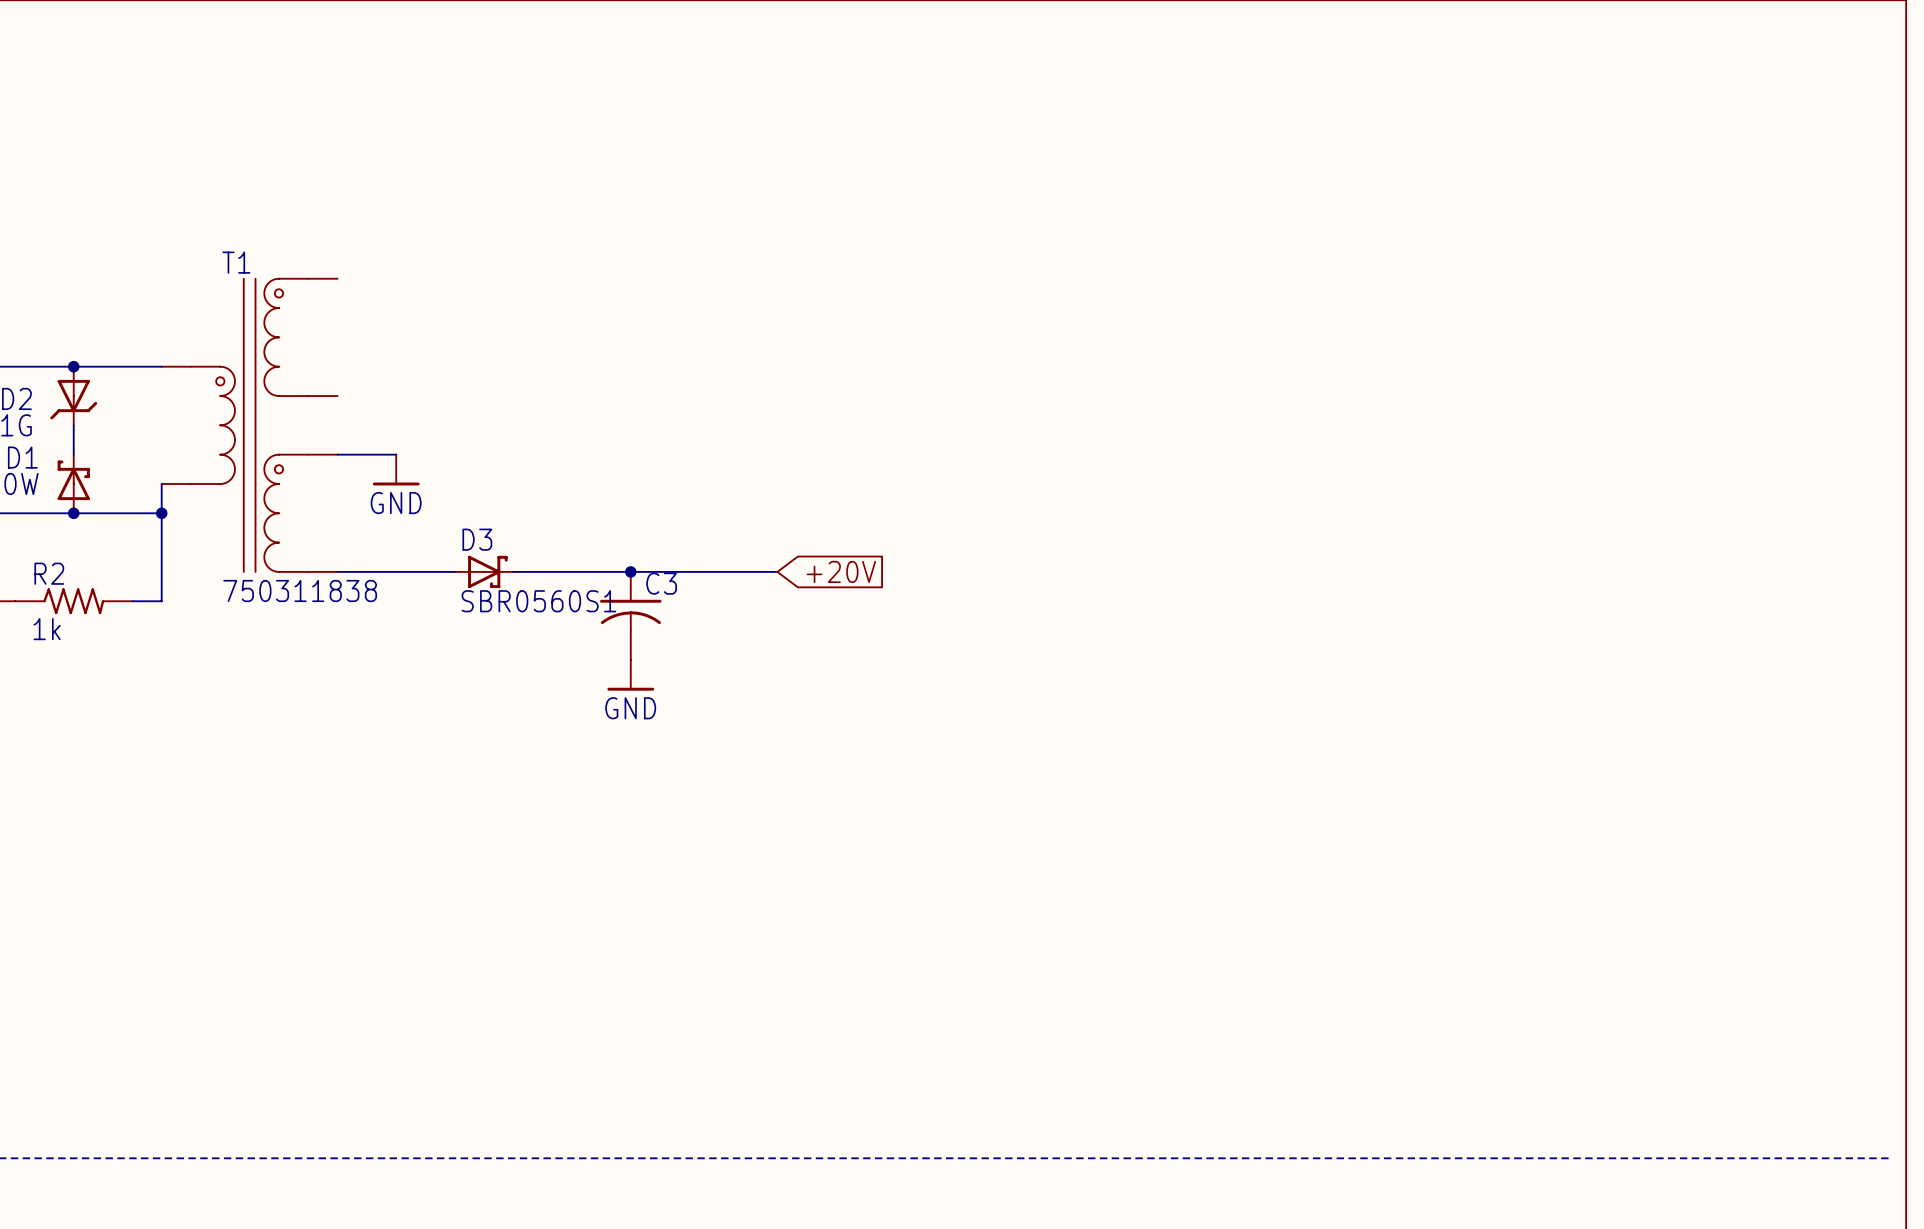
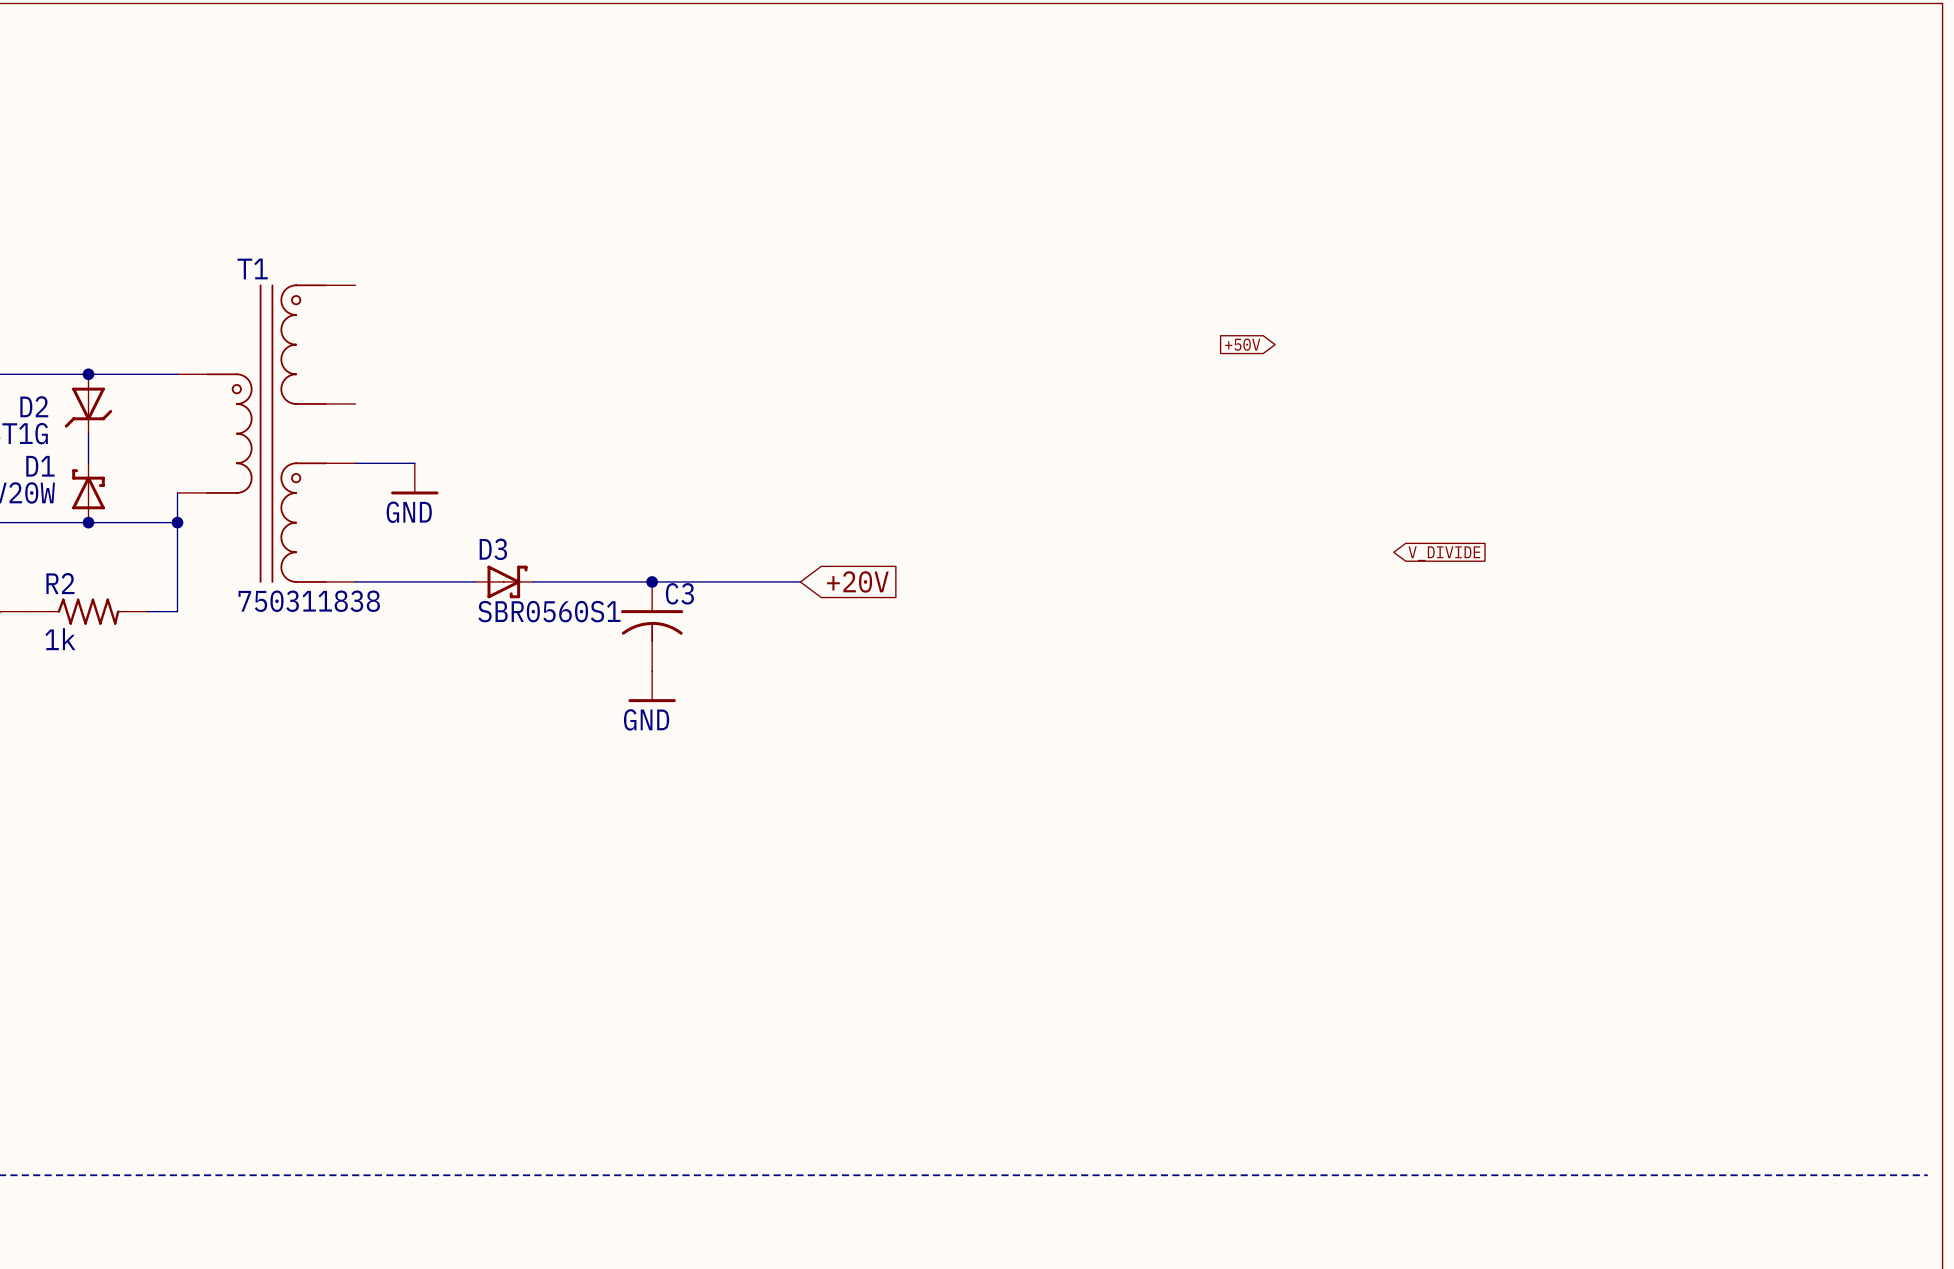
global label: none -> +50V (1242, 344)
global label: none -> V_DIVIDE (1444, 553)

